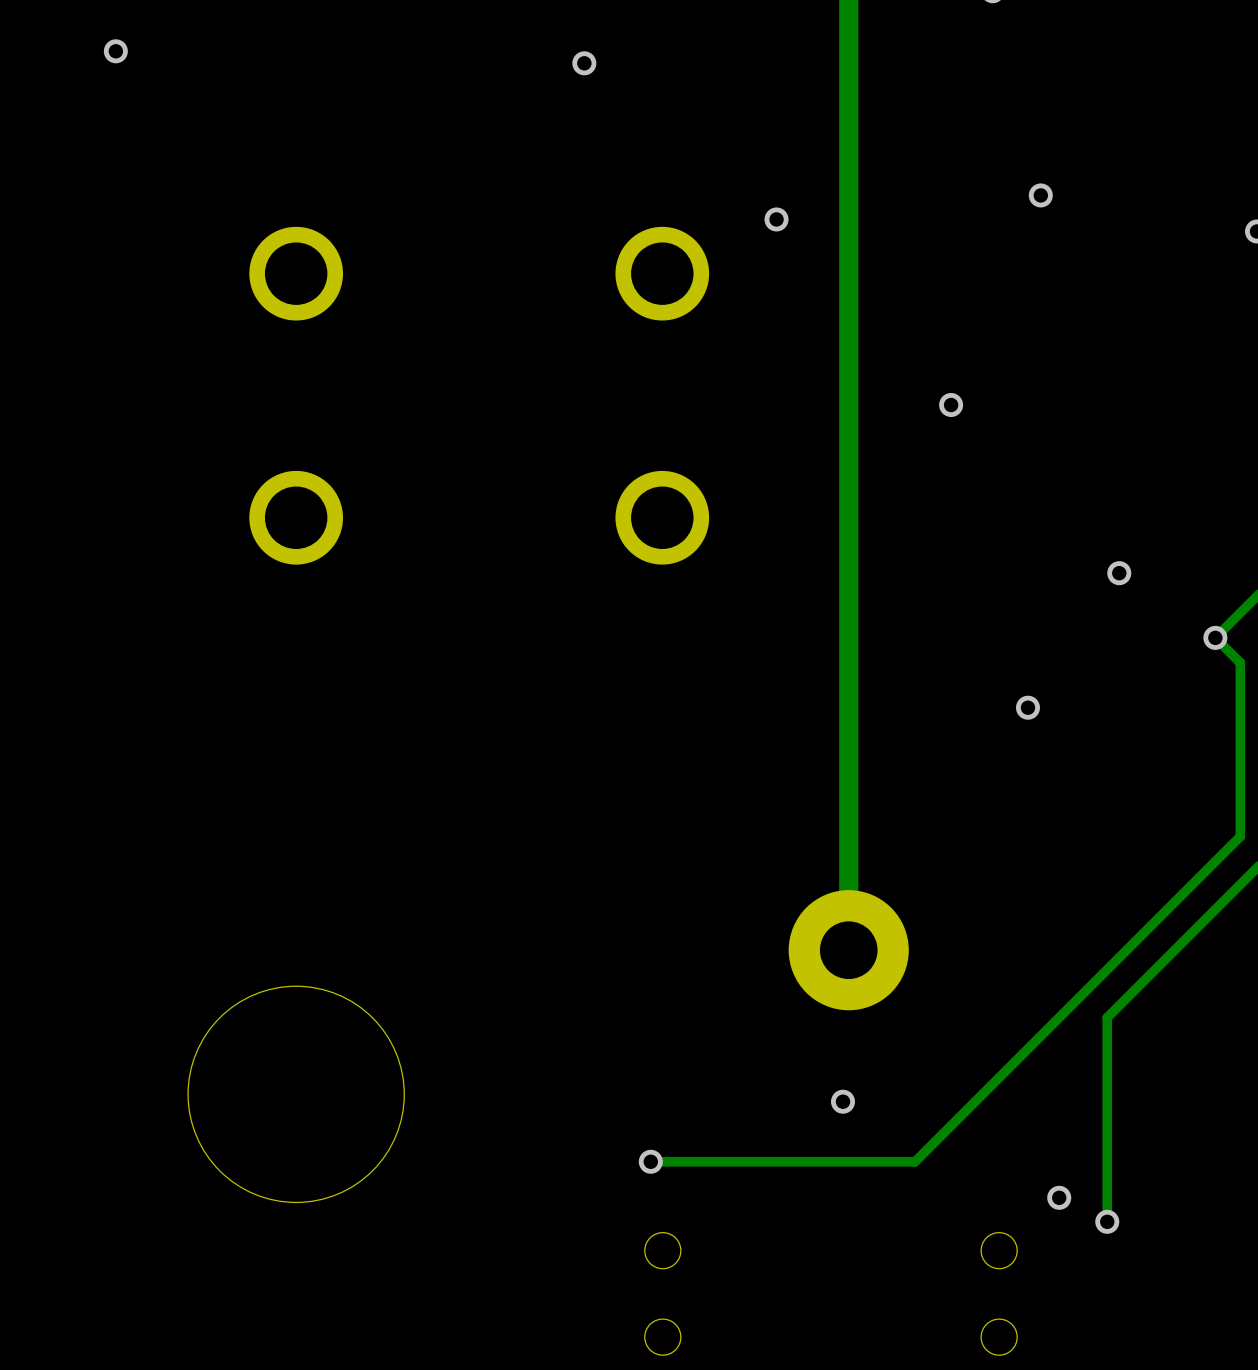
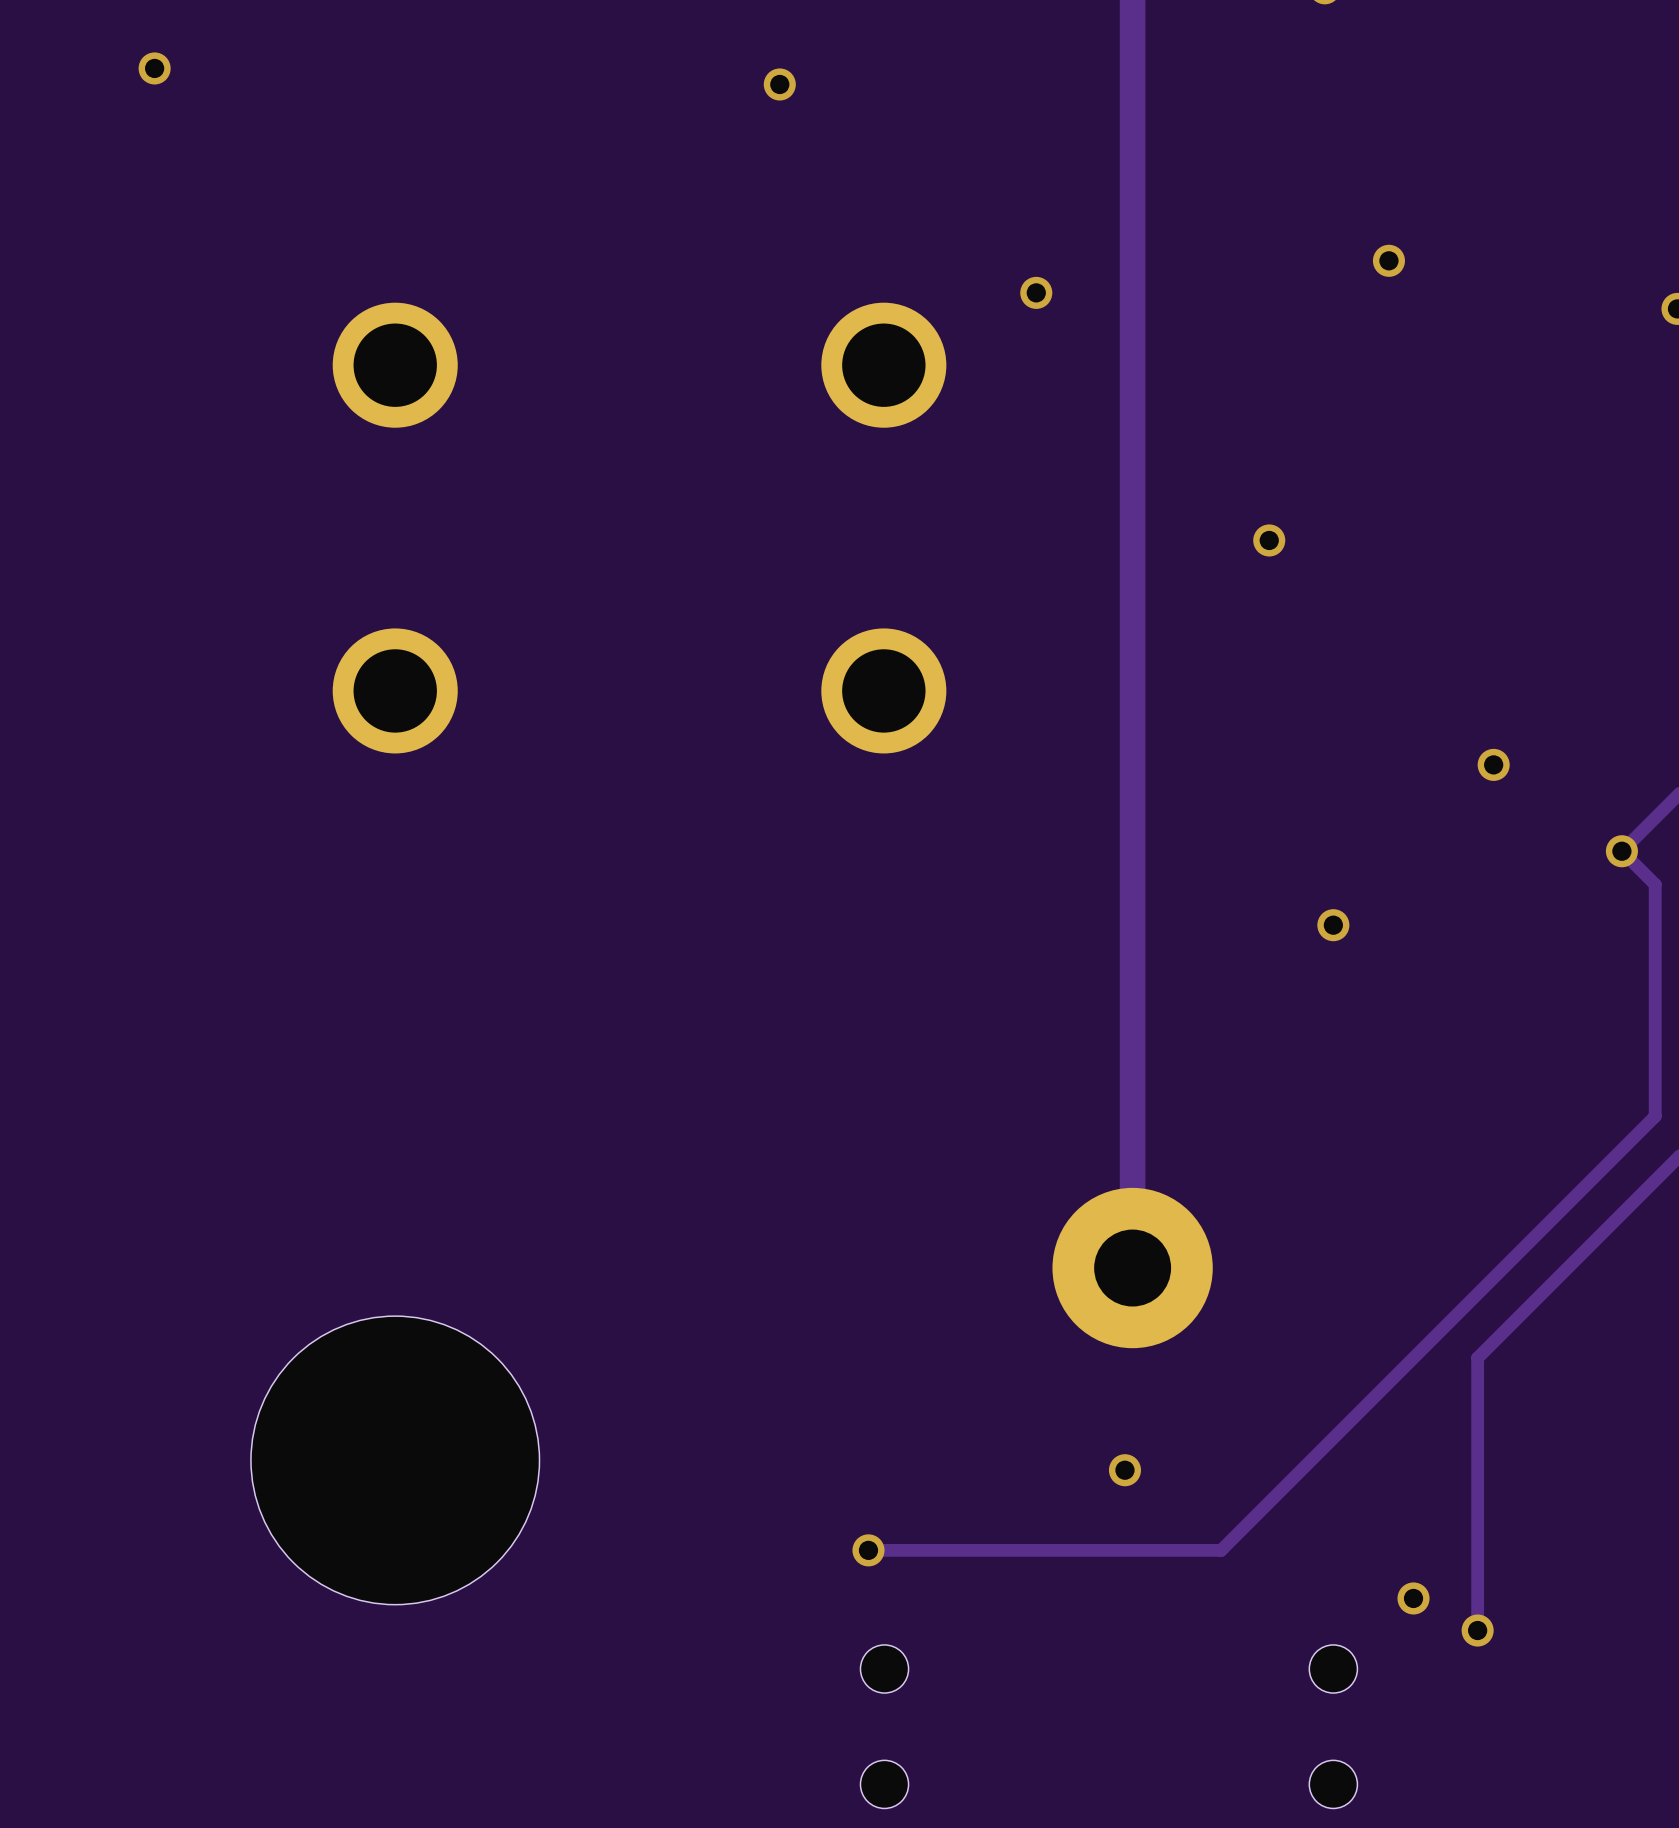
via position: (1027, 707) -> (1333, 925)

